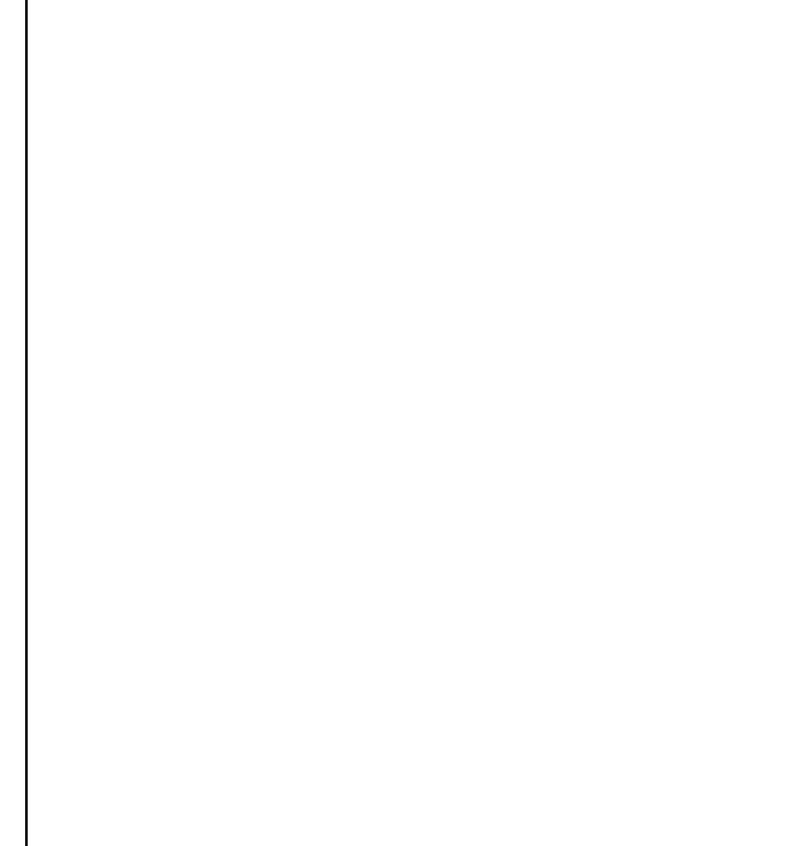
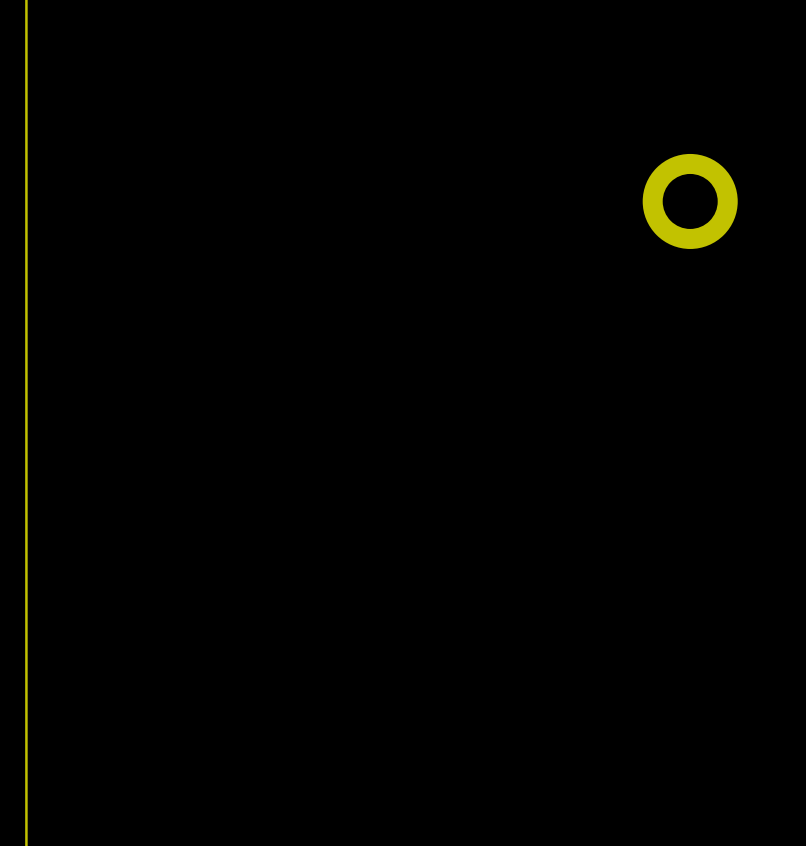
part: none -> (690, 201)

